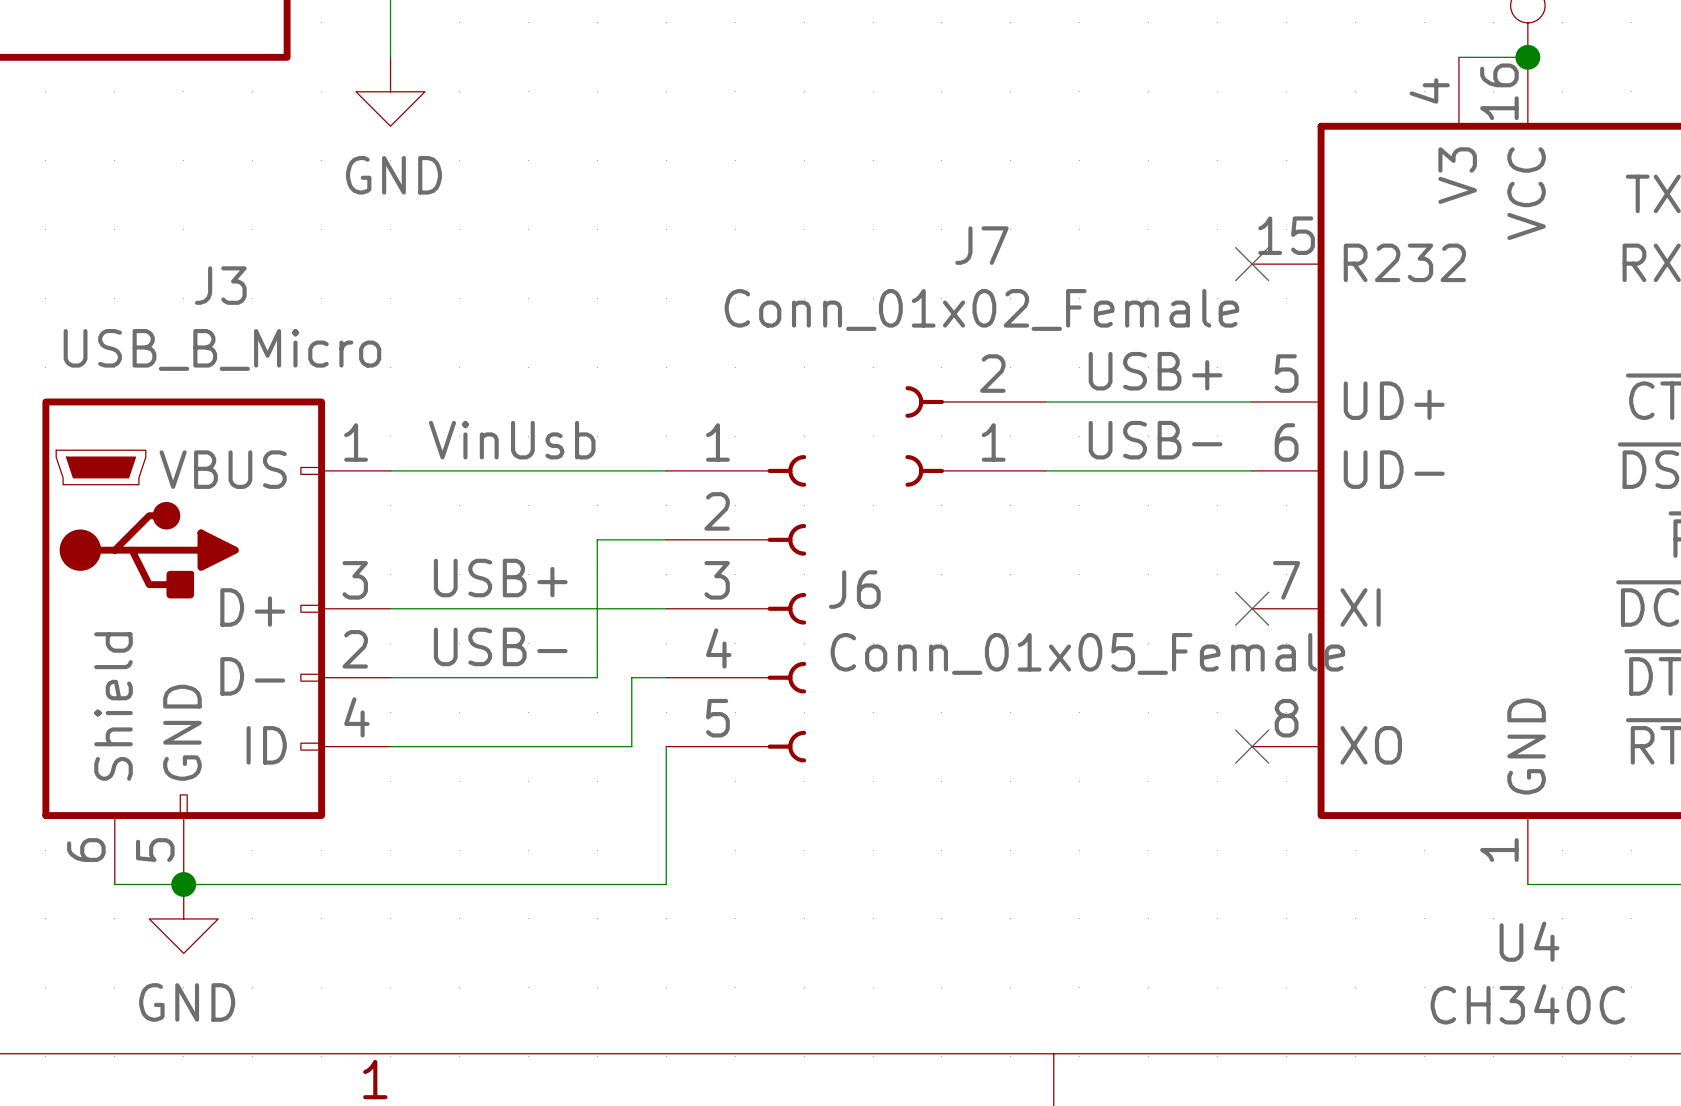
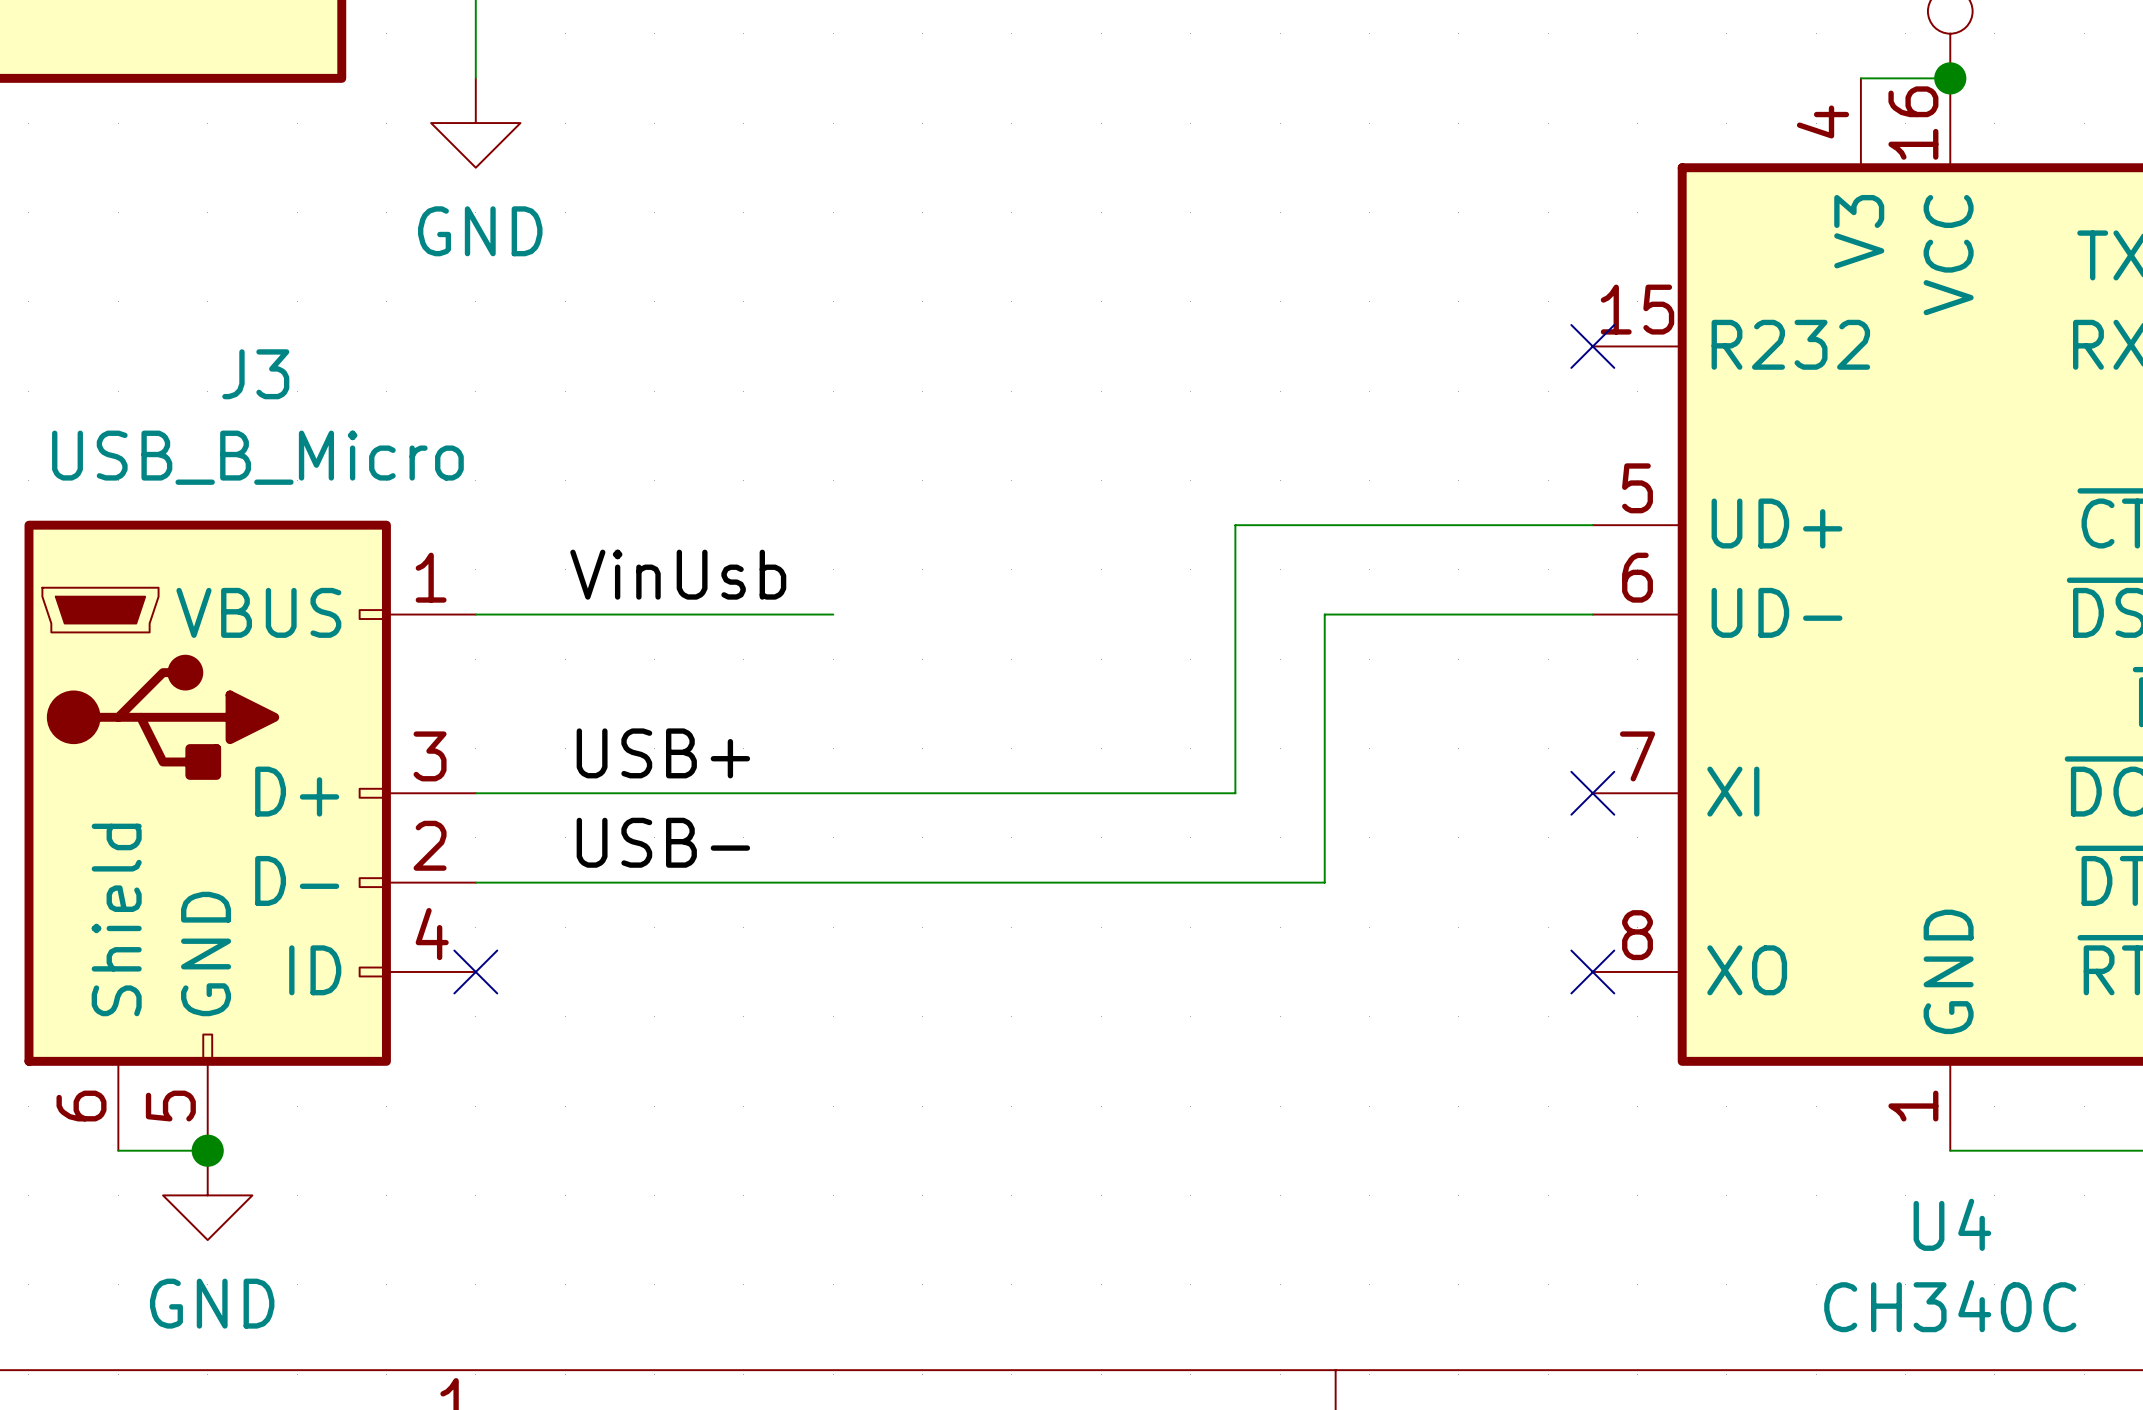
label: USB+ (1155, 371) -> none
wire: none -> (1324, 525) (1235, 525) (1235, 793) (833, 793)
J7: Conn_01x02_Female (975, 436) -> none
label position: VinUsb (512, 440) -> VinUsb (678, 574)
label: USB- (1155, 440) -> none
wire: none -> (1324, 614) (1324, 882) (833, 882)
wire: (666, 539) (597, 539) (597, 677) -> (788, 882) (743, 882)
label position: USB+ (500, 578) -> USB+ (663, 753)
J6: Conn_01x05_Female (736, 608) -> none
label position: USB- (500, 646) -> USB- (663, 842)
wire: (631, 677) (631, 746) (390, 746) -> none
no-connect mark: none -> (475, 971)
wire: (666, 746) (666, 884) (183, 884) -> none

